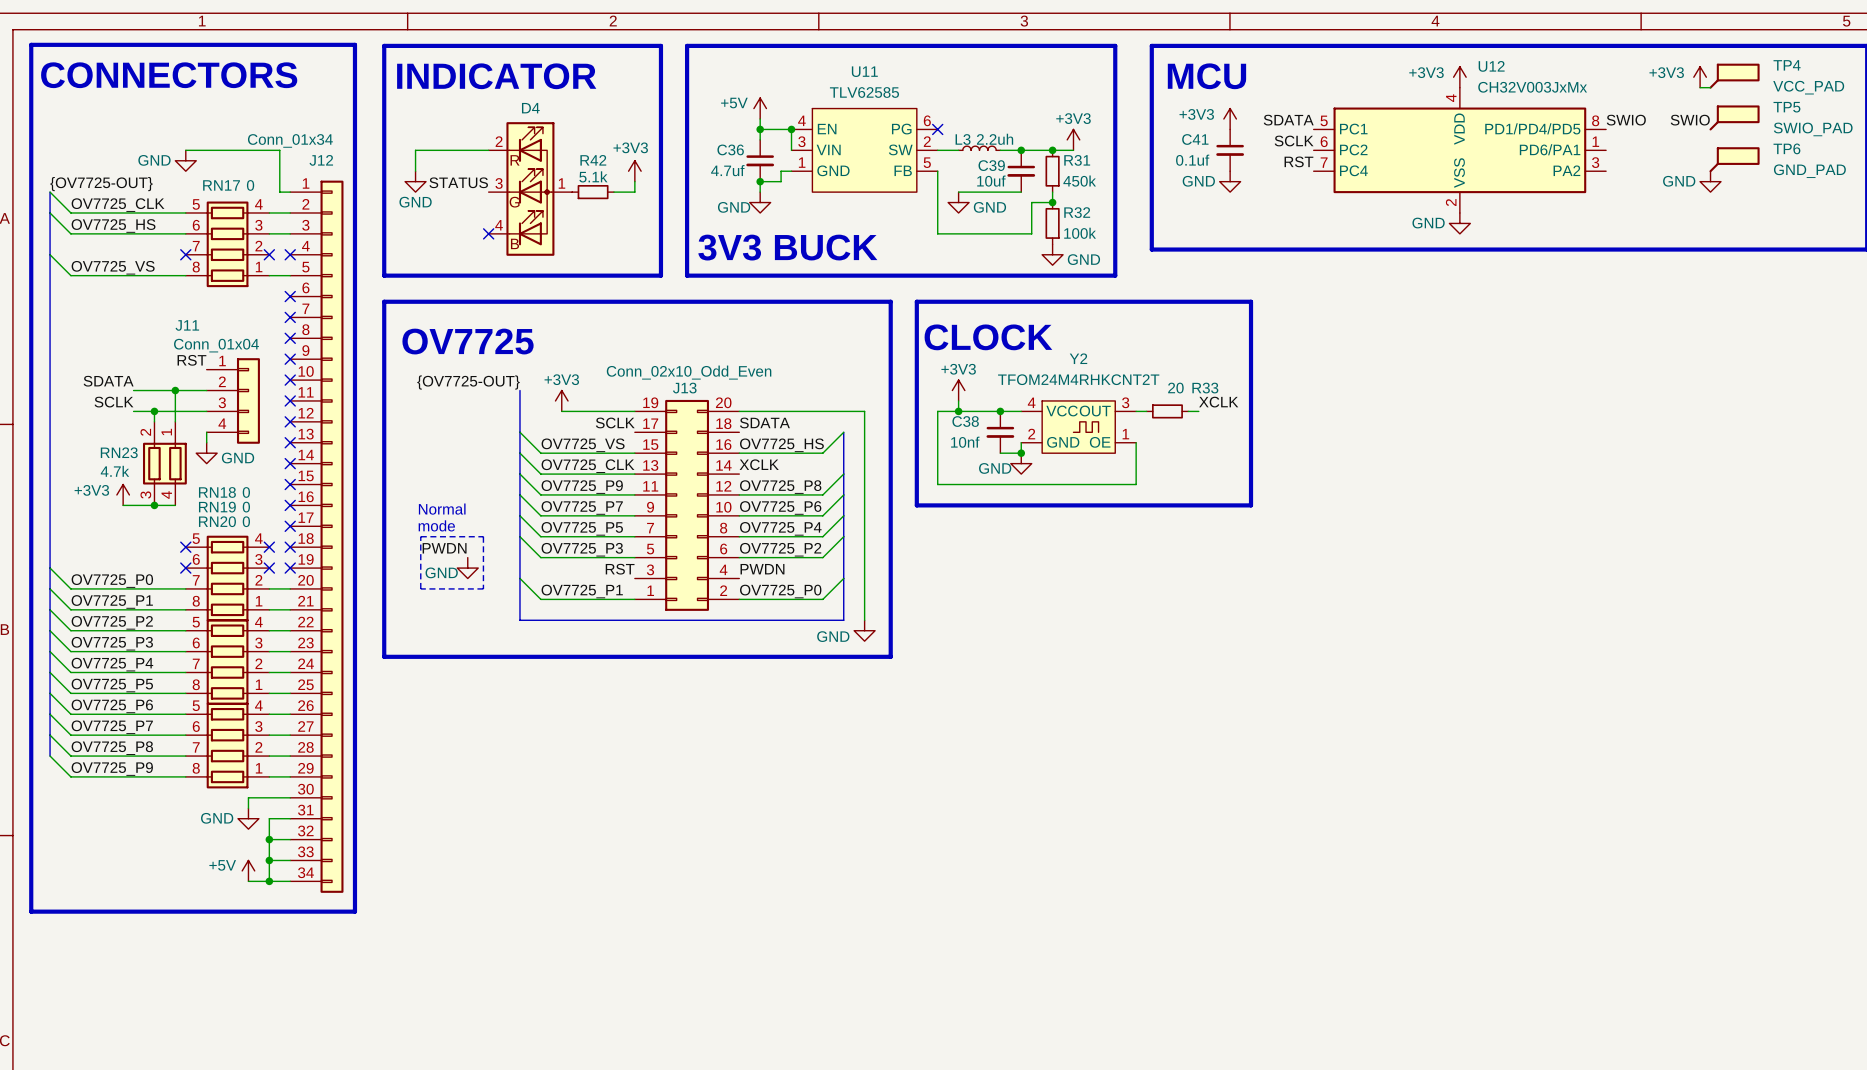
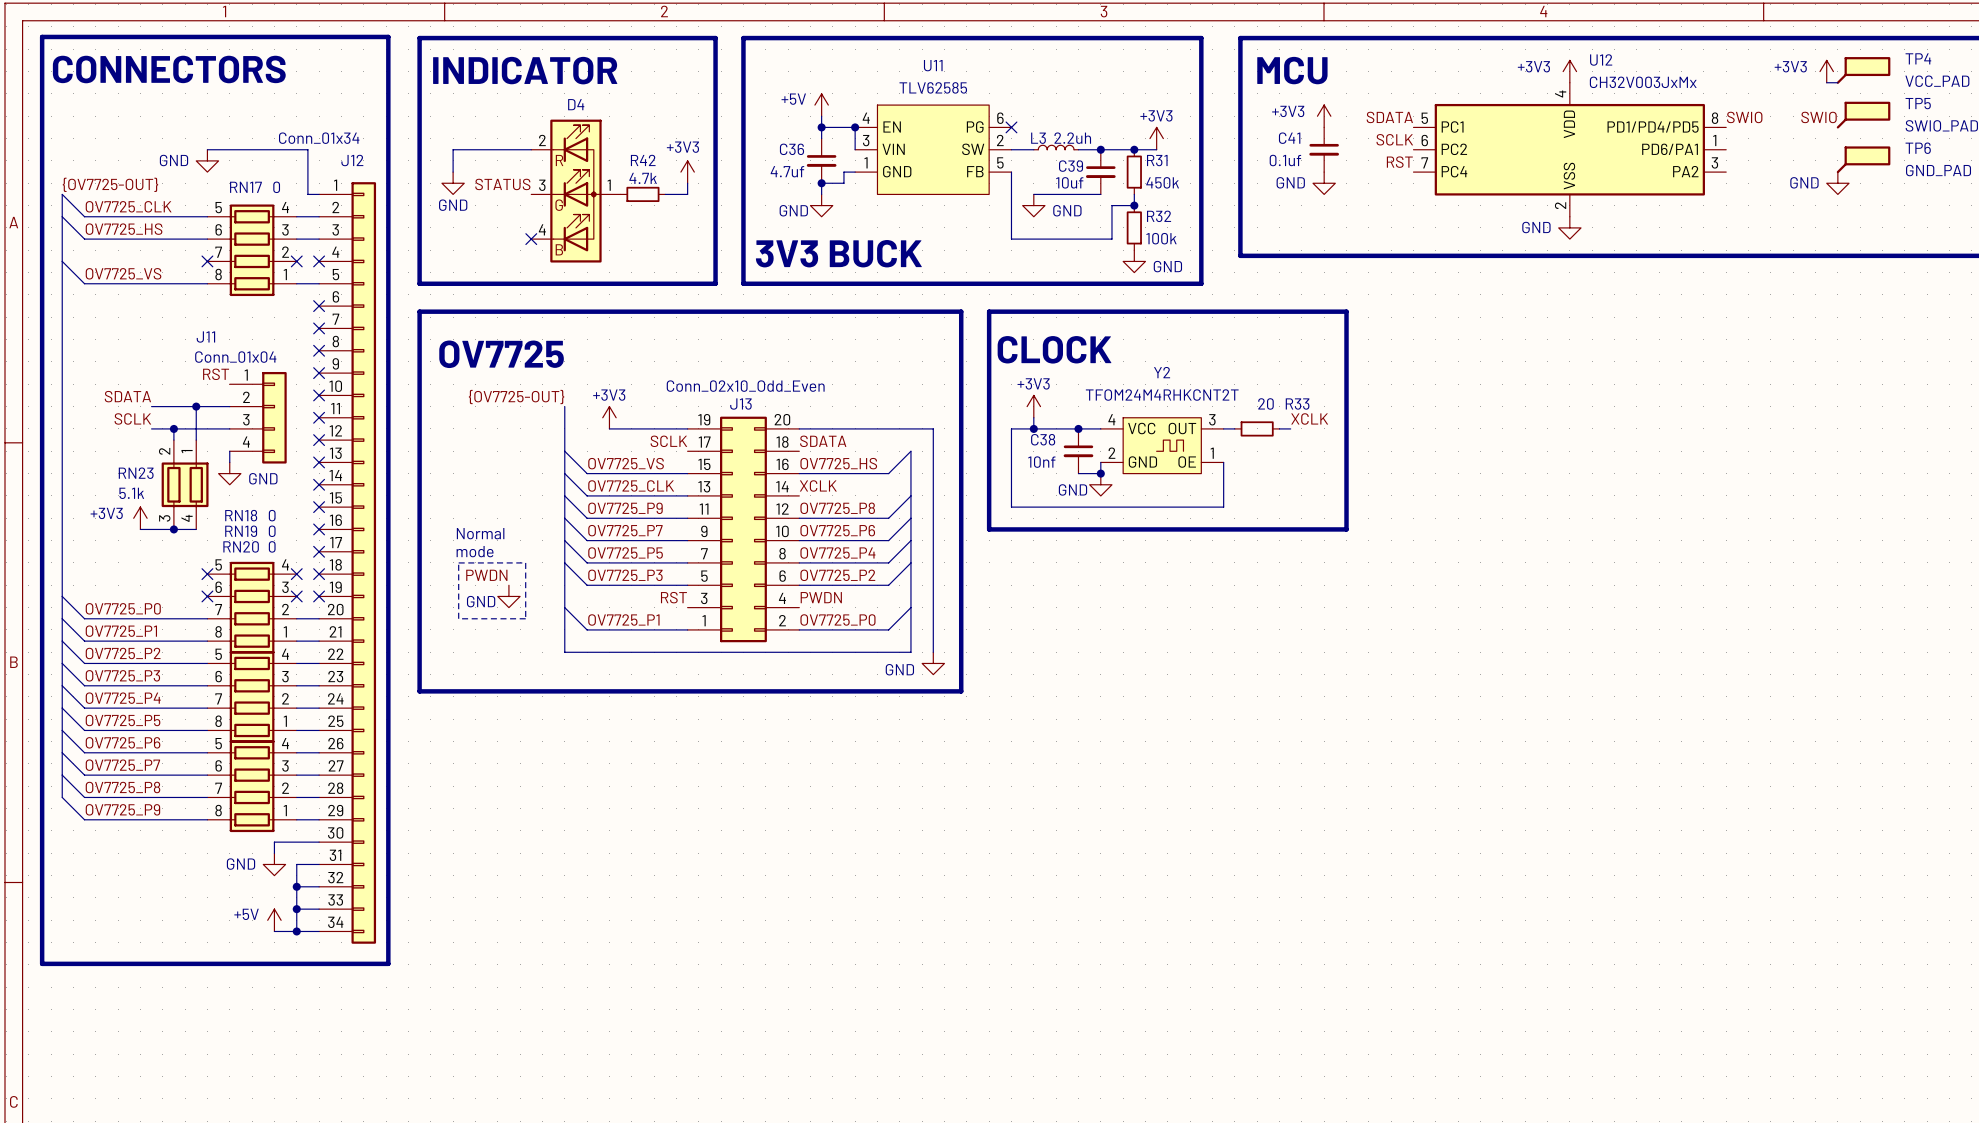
R42 value: 5.1k (593, 176) -> 4.7k (643, 178)
RN23 value: 4.7k (114, 471) -> 5.1k (131, 493)

